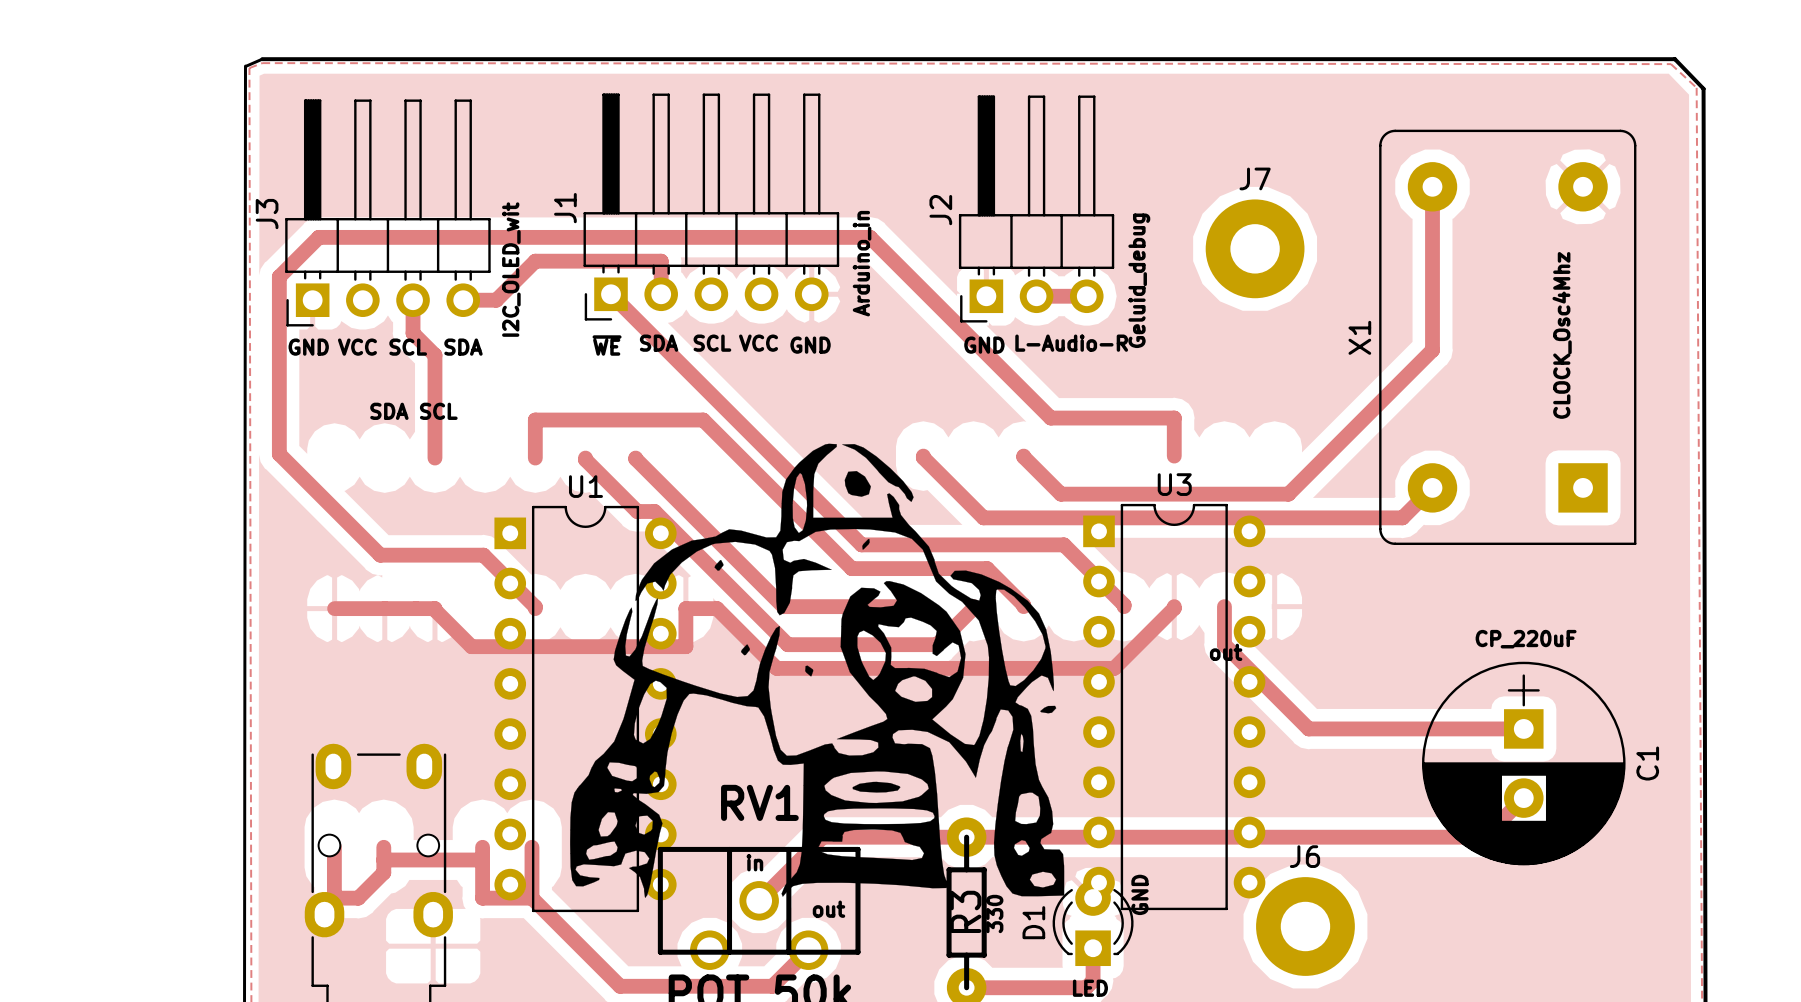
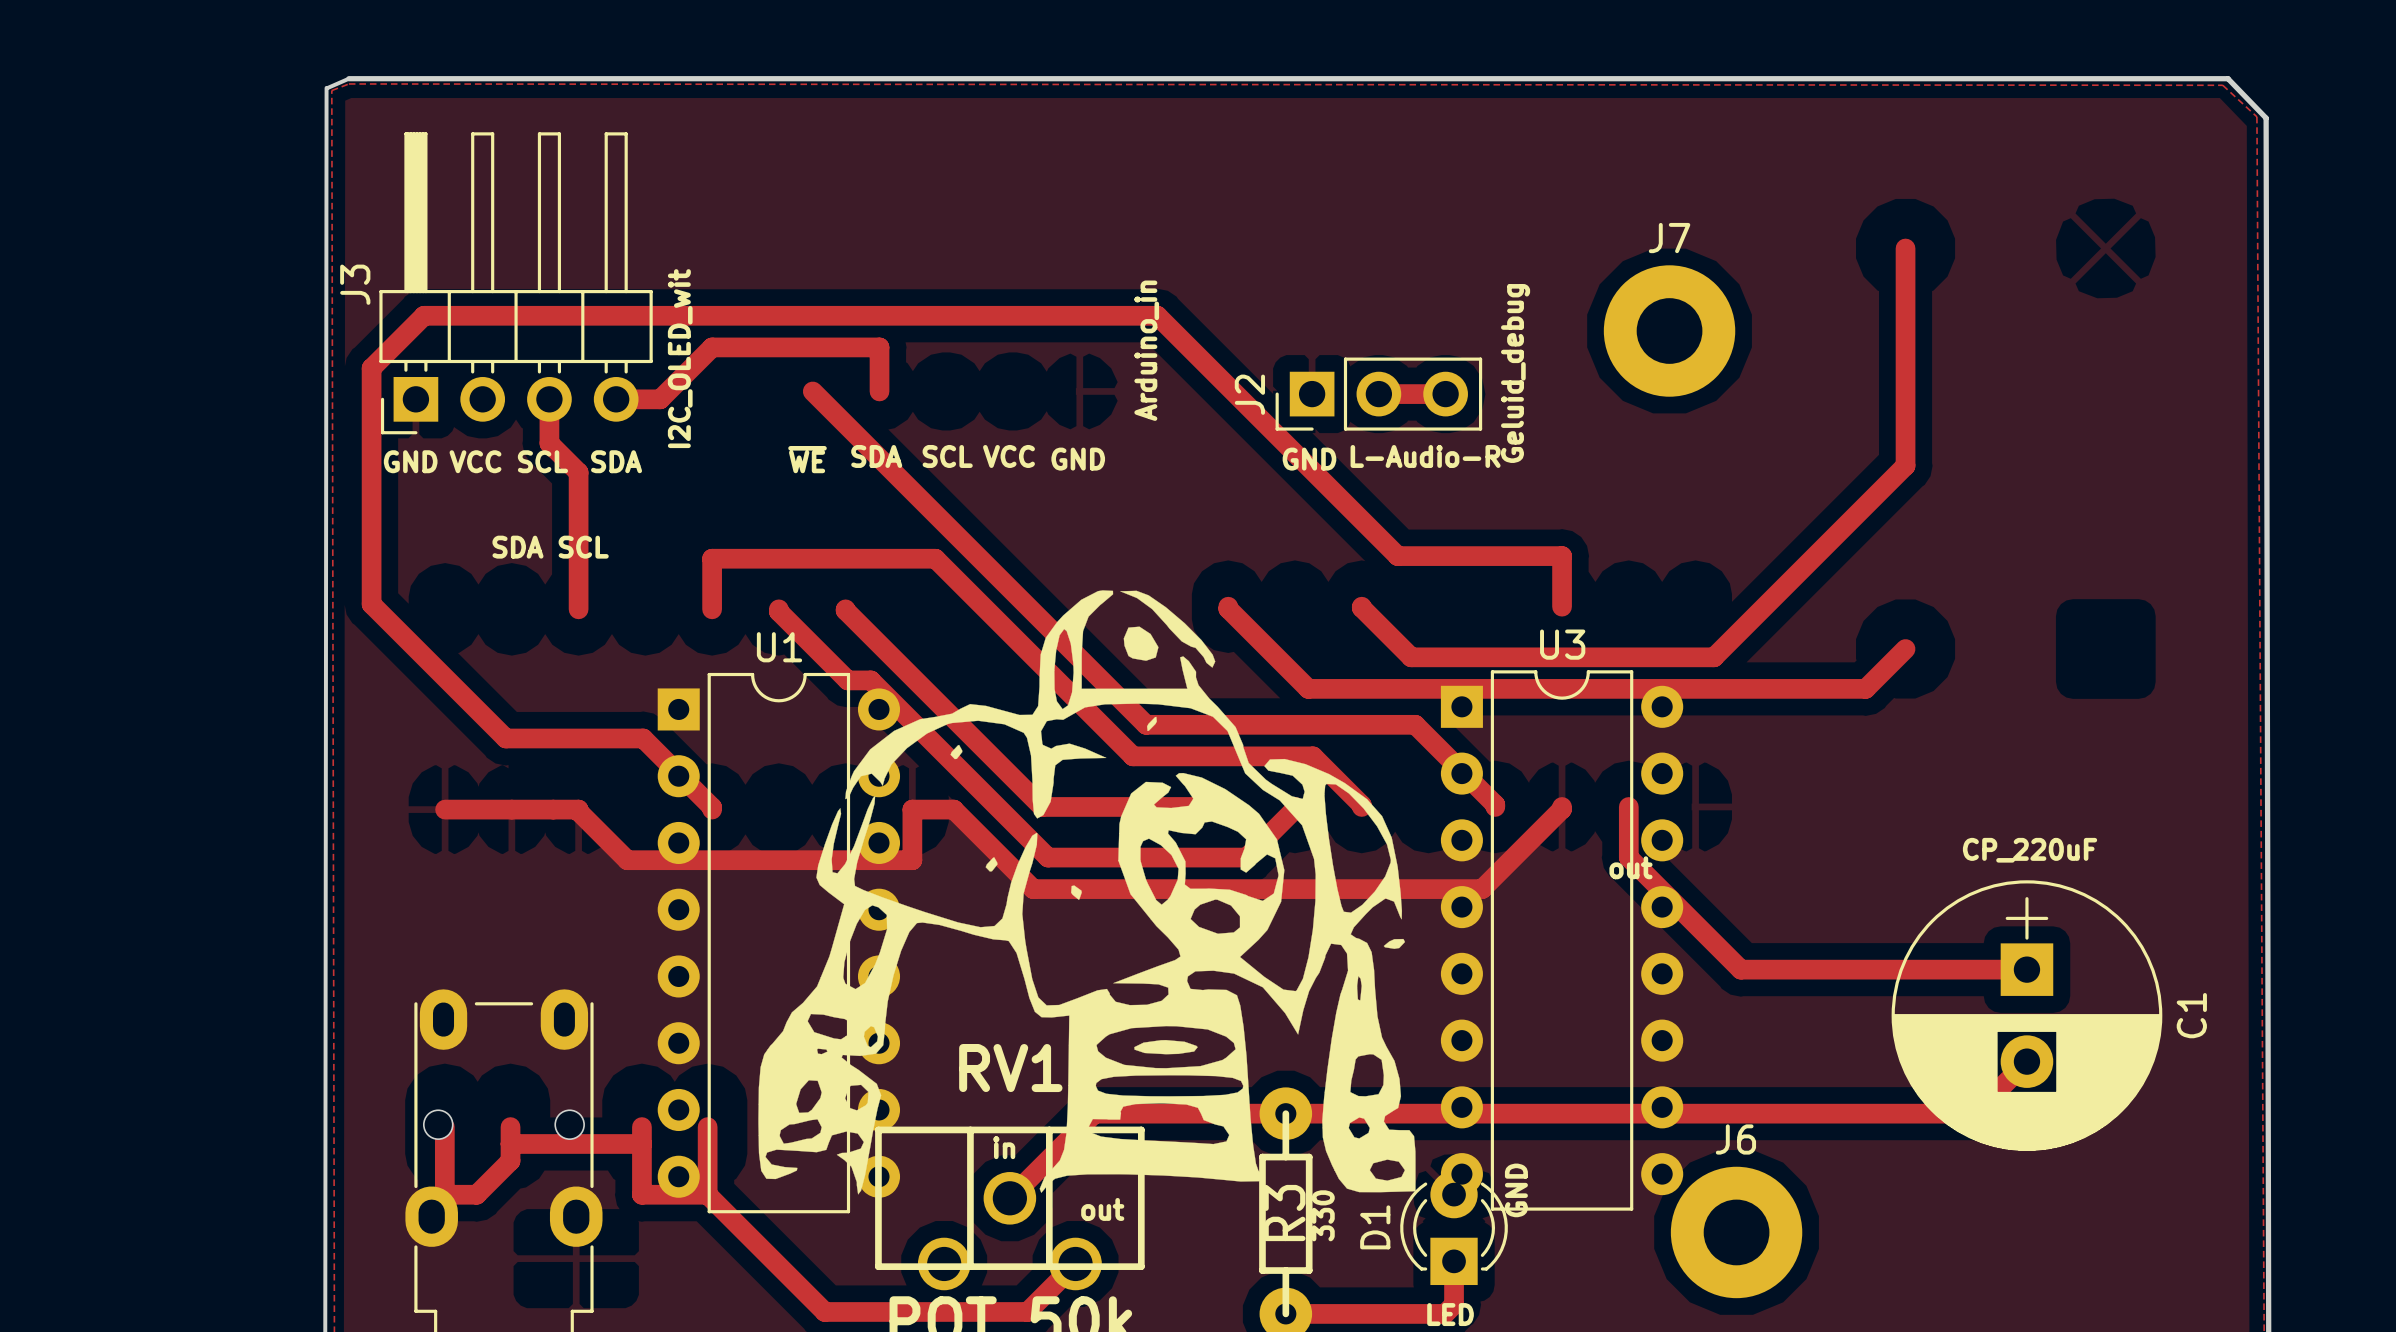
J2 footprint: [958, 95, 1115, 323] -> [1275, 357, 1483, 431]
J1: (711, 207) -> none
text: CLOCK_Osc4Mhz (1562, 335) -> none
X1: (1507, 337) -> none

